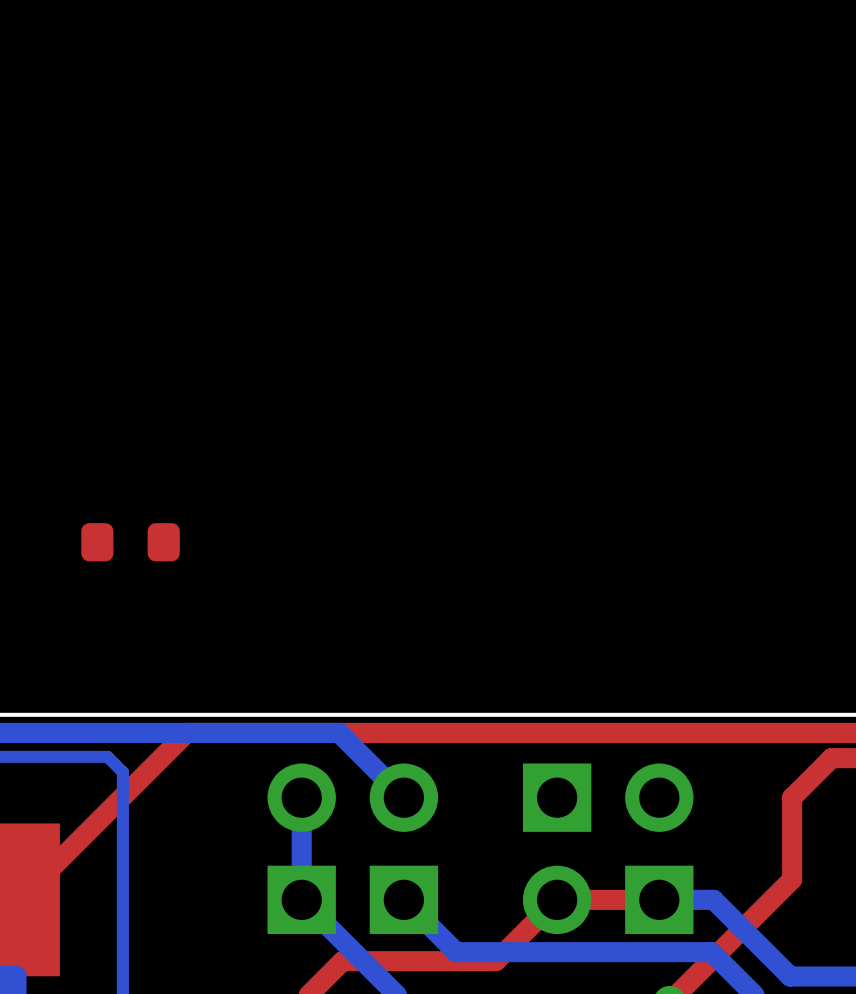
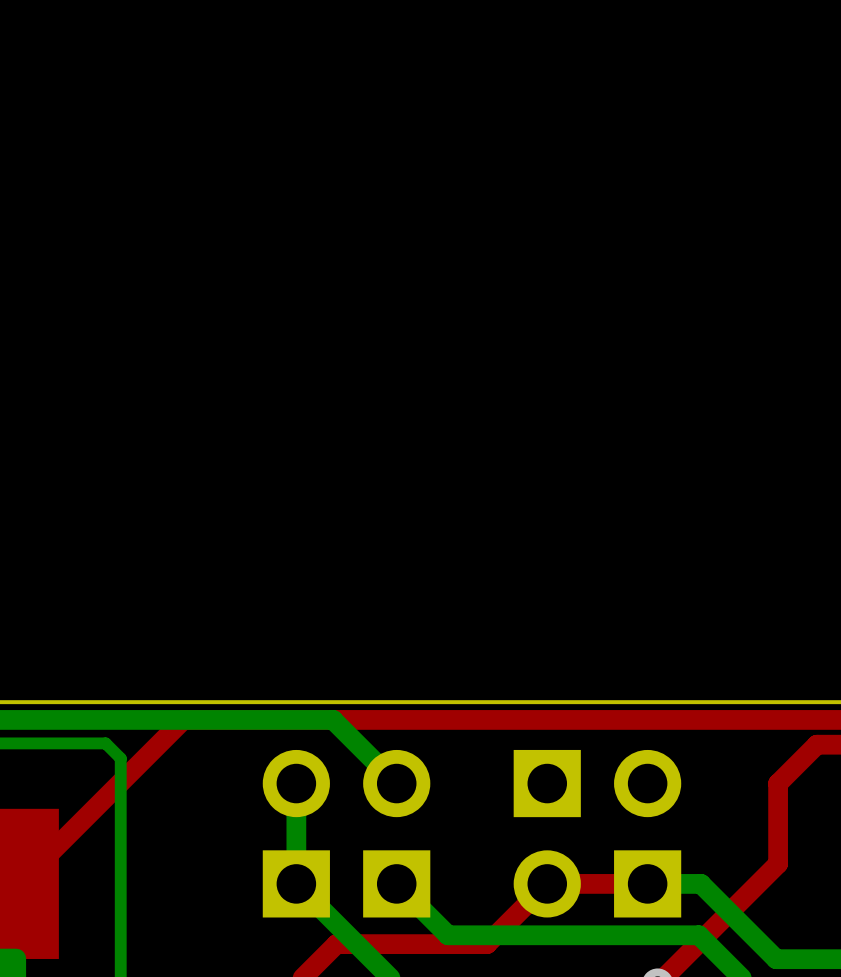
part: (130, 542) -> none

